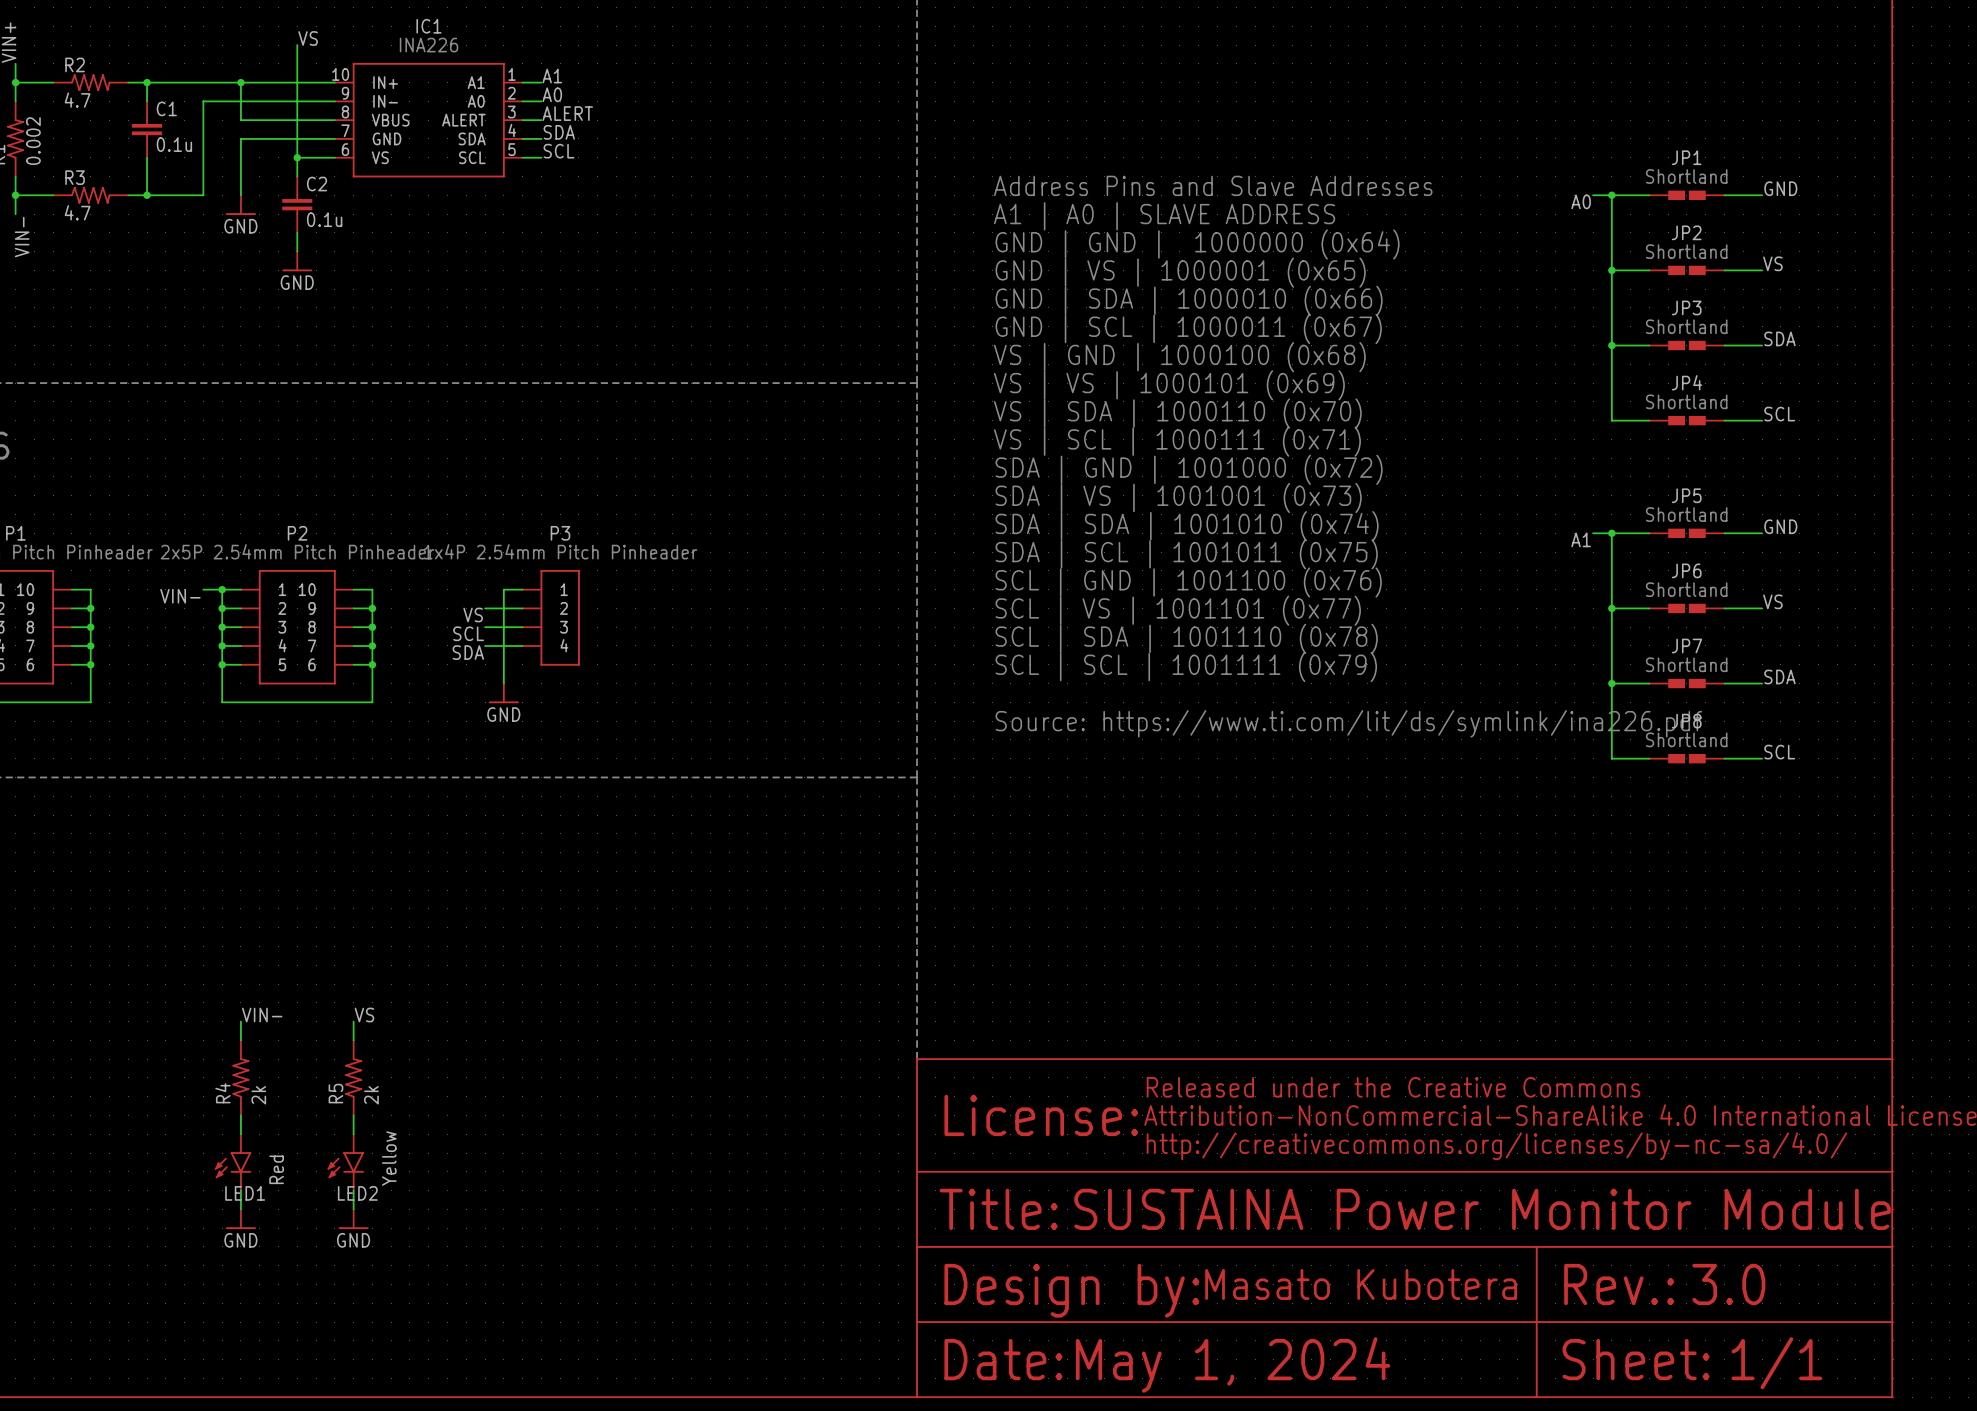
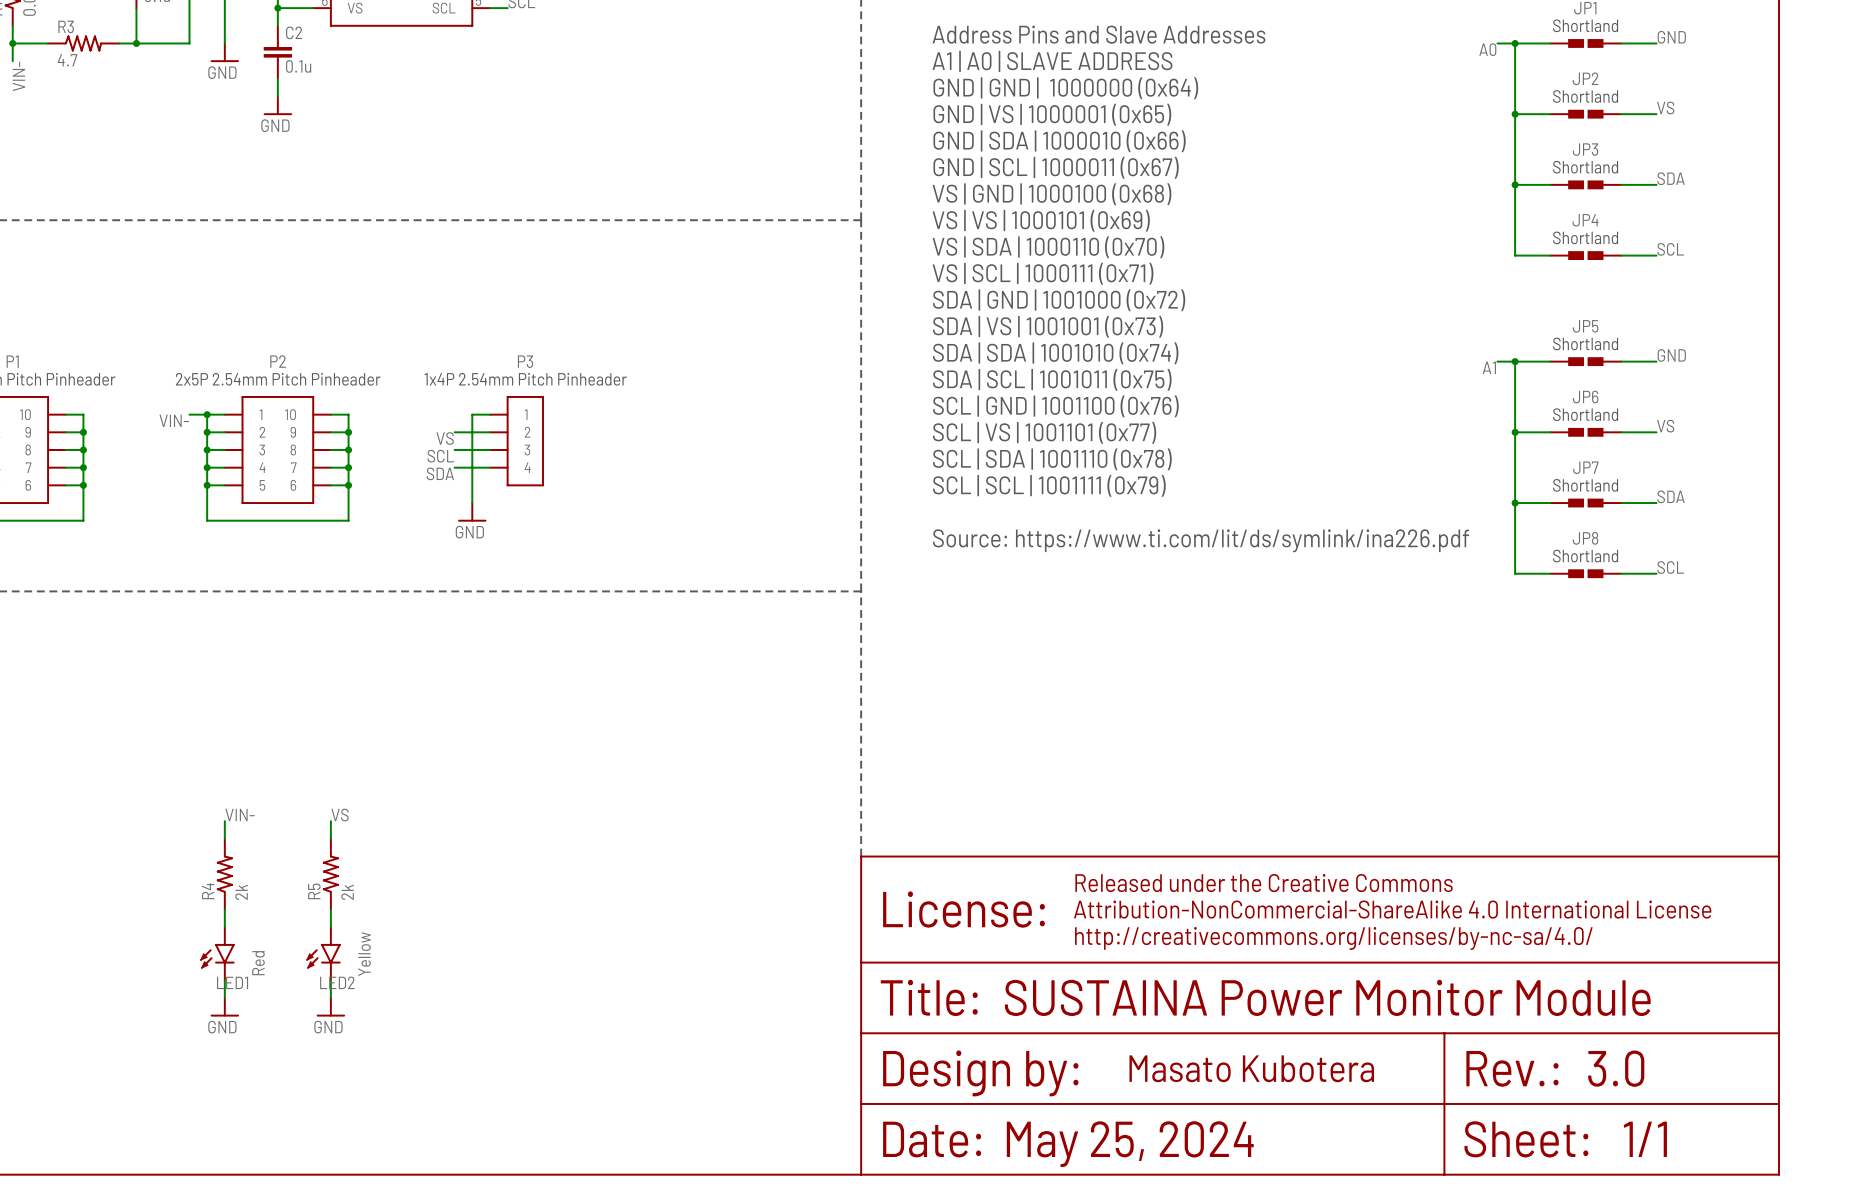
text: May 1, 2024 (1233, 1364) -> May 25, 2024 (1130, 1144)

